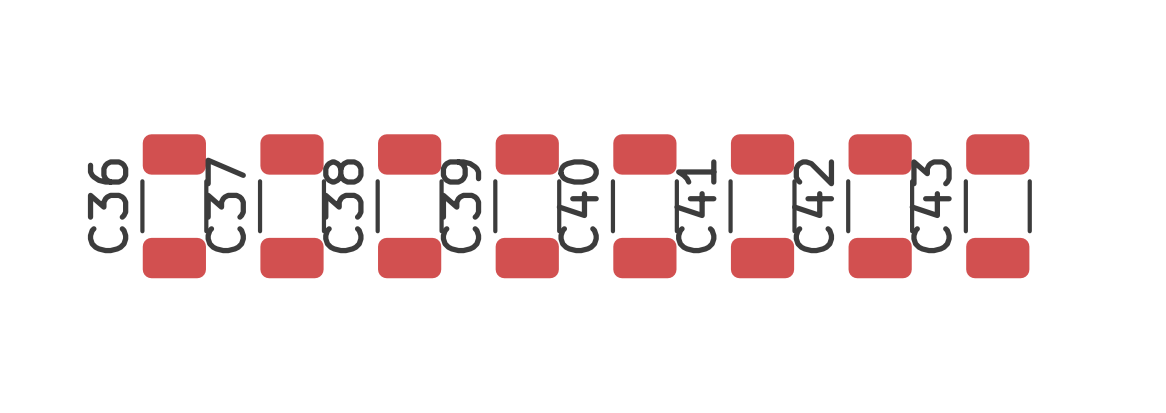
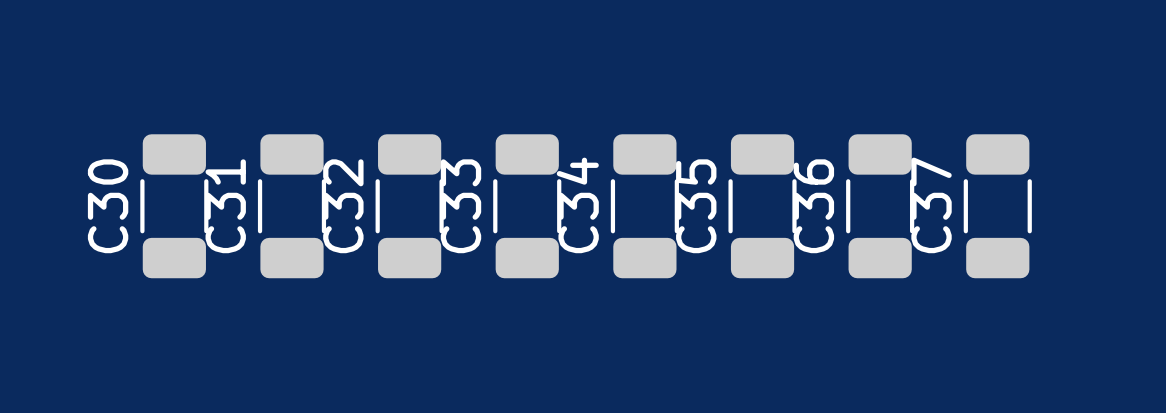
C37 name: C37 (225, 205) -> C31 (225, 206)
C36 name: C36 (108, 206) -> C30 (108, 206)
C38 name: C38 (343, 206) -> C32 (343, 206)
C39 name: C39 (460, 206) -> C33 (460, 206)
C40 name: C40 (577, 206) -> C34 (577, 205)
C41 name: C41 (695, 206) -> C35 (696, 206)
C42 name: C42 (813, 206) -> C36 (813, 206)
C43 name: C43 (930, 206) -> C37 (931, 205)

